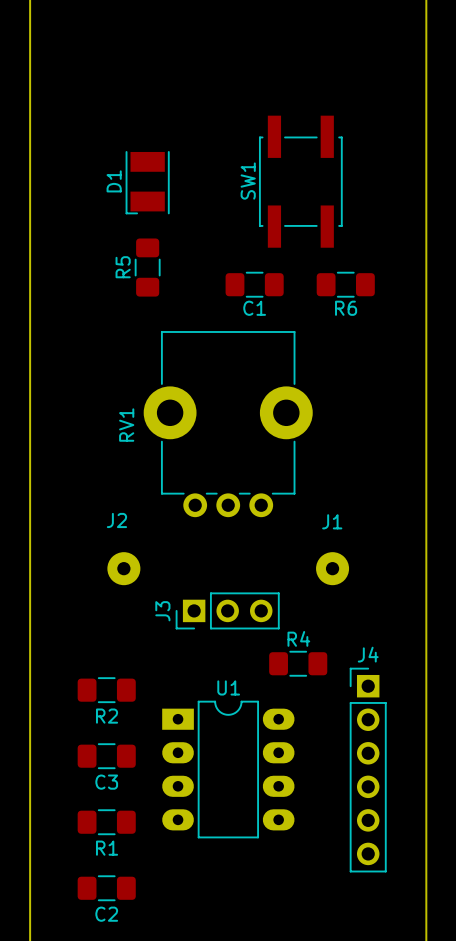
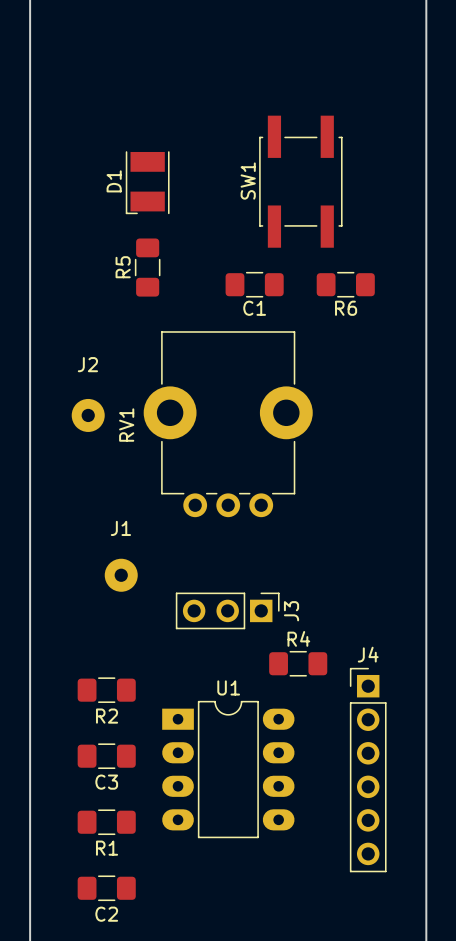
J2 name position: J2 (116, 520) -> J2 (87, 364)
J2 position: (123, 568) -> (88, 415)
J1 position: (332, 568) -> (121, 575)
J3 rotation: 0° (227, 610) -> 180° (227, 610)

